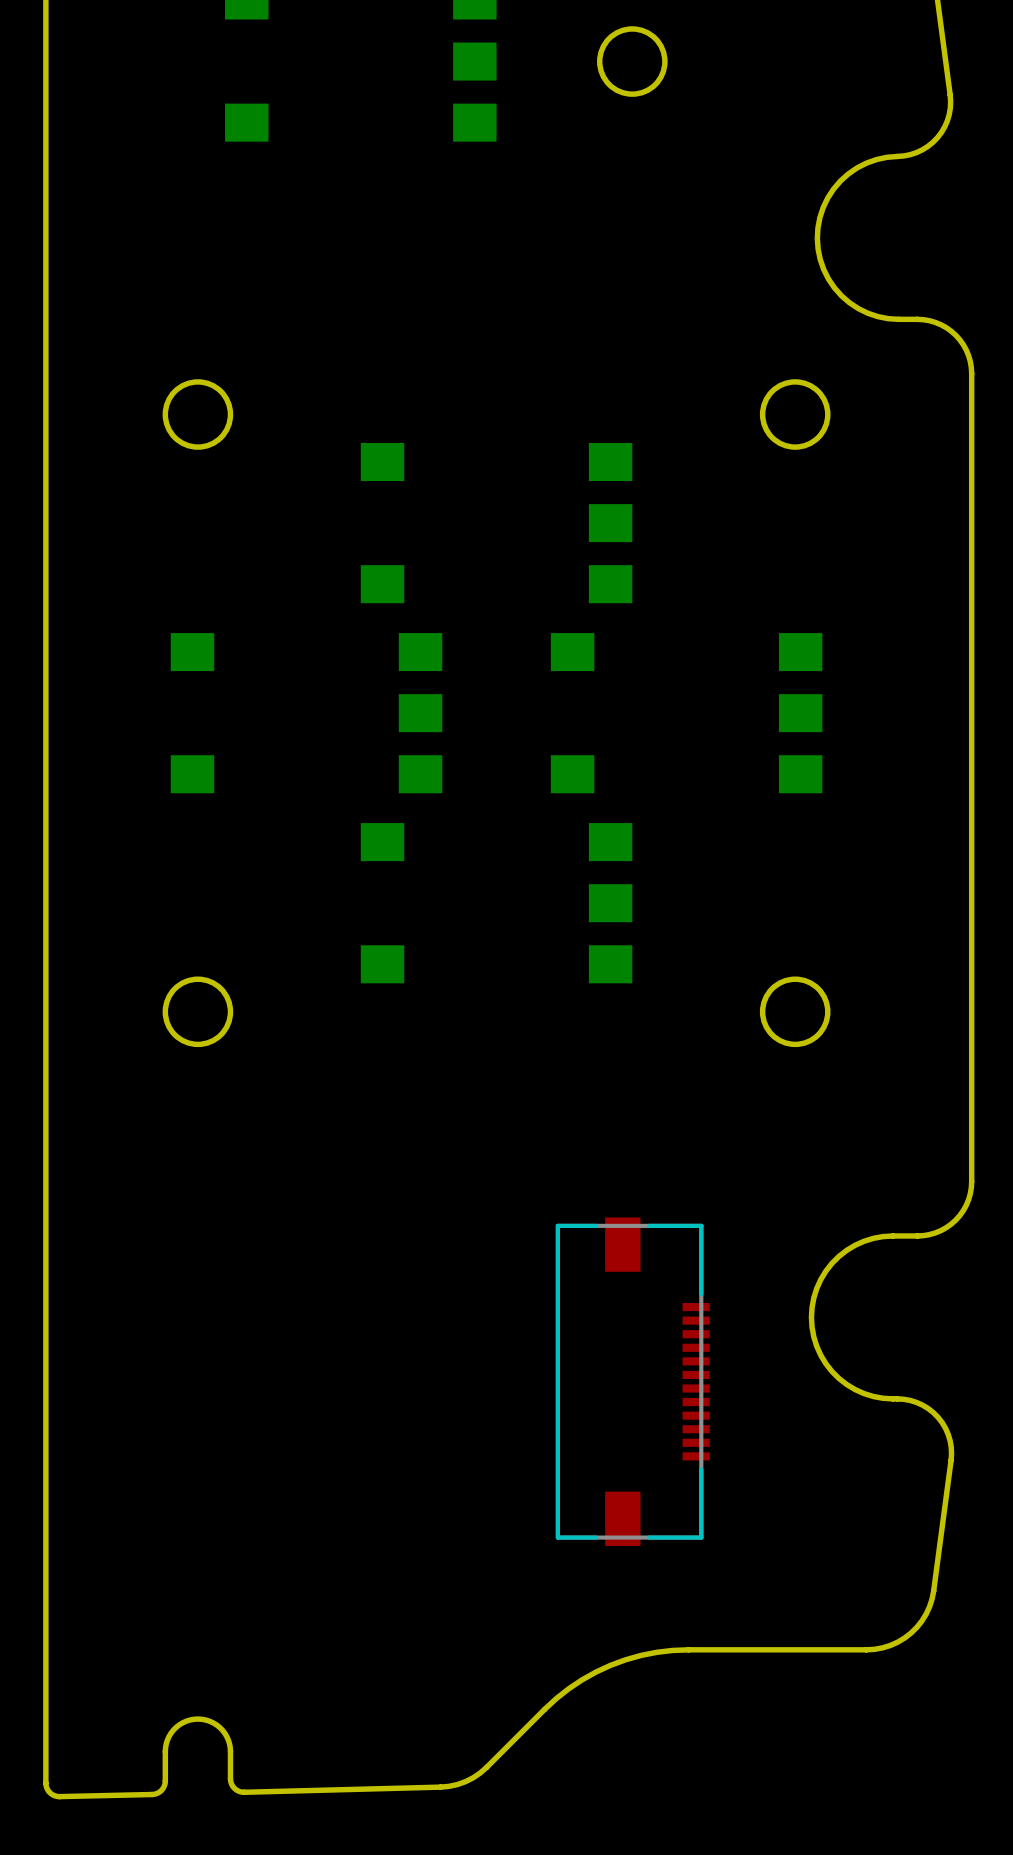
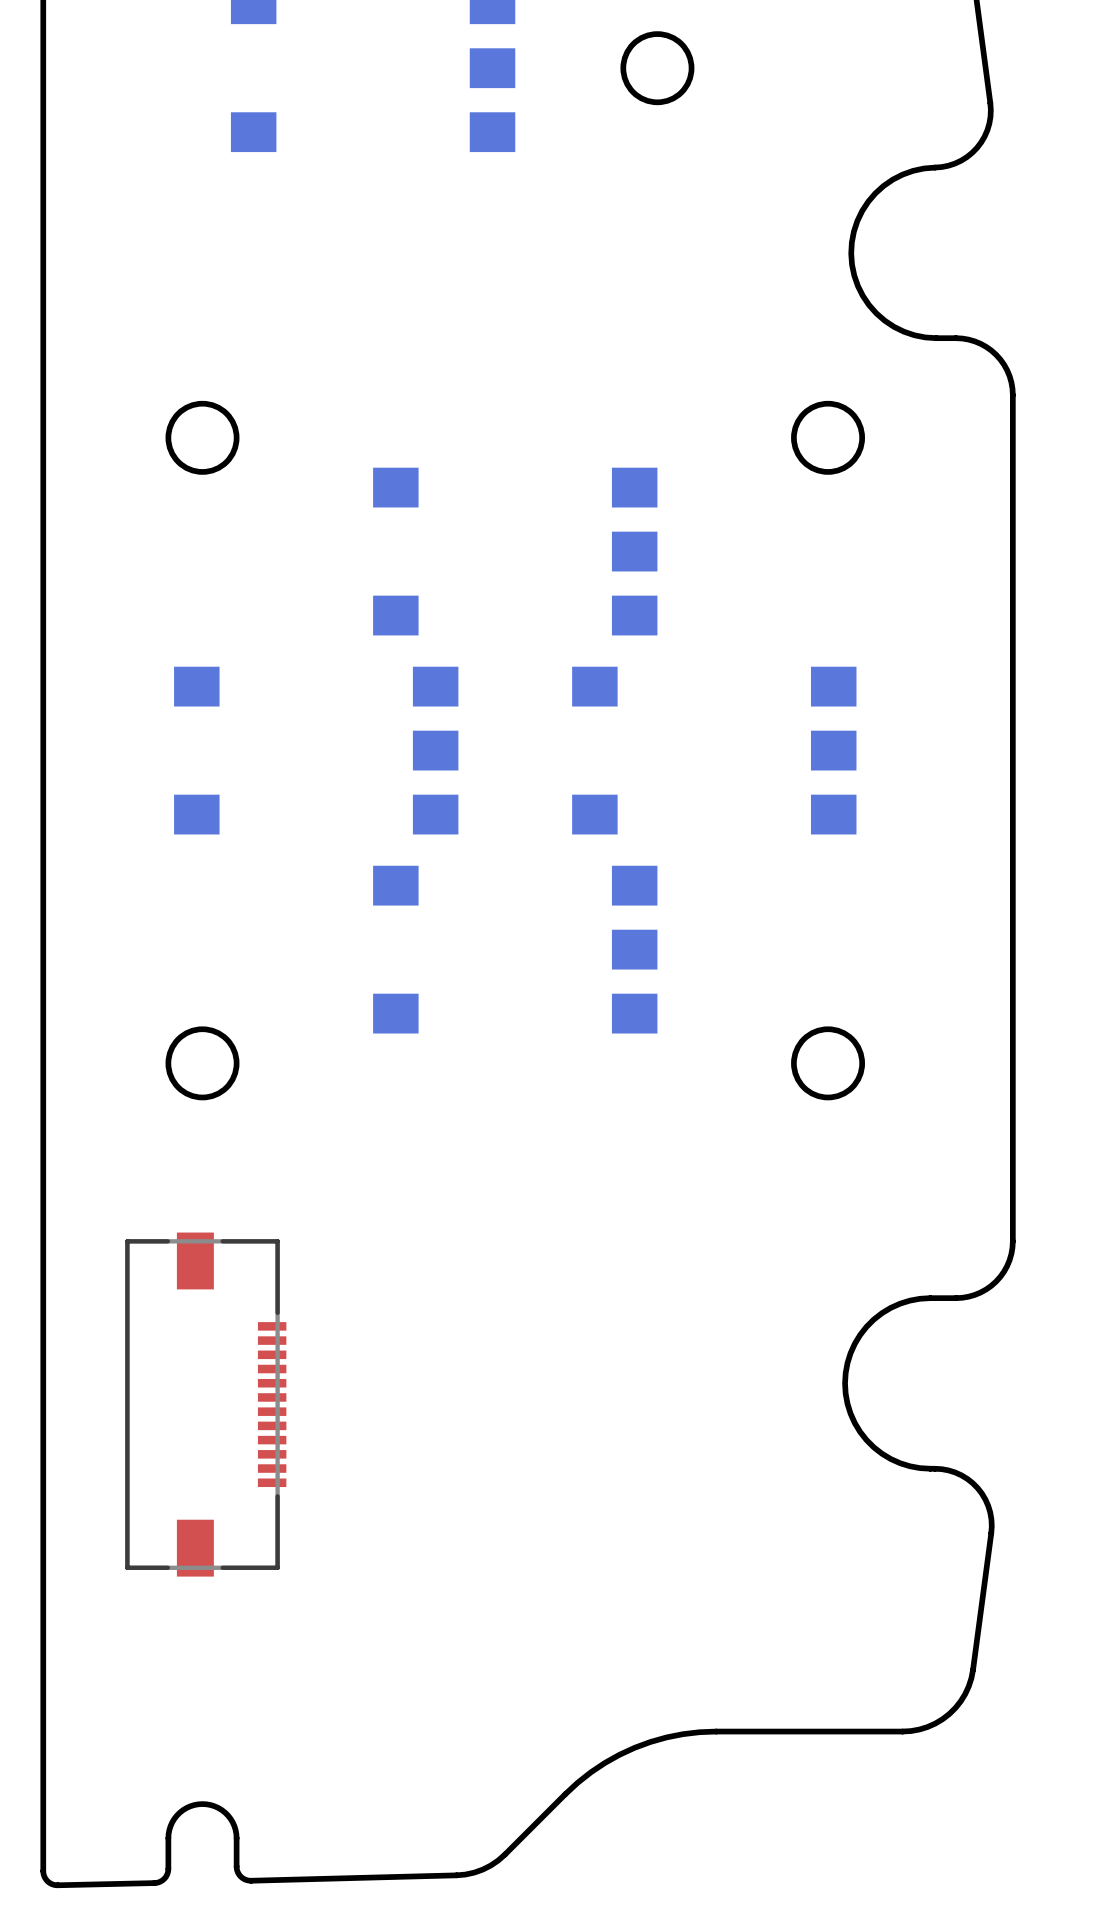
part position: (641, 1381) -> (215, 1404)

